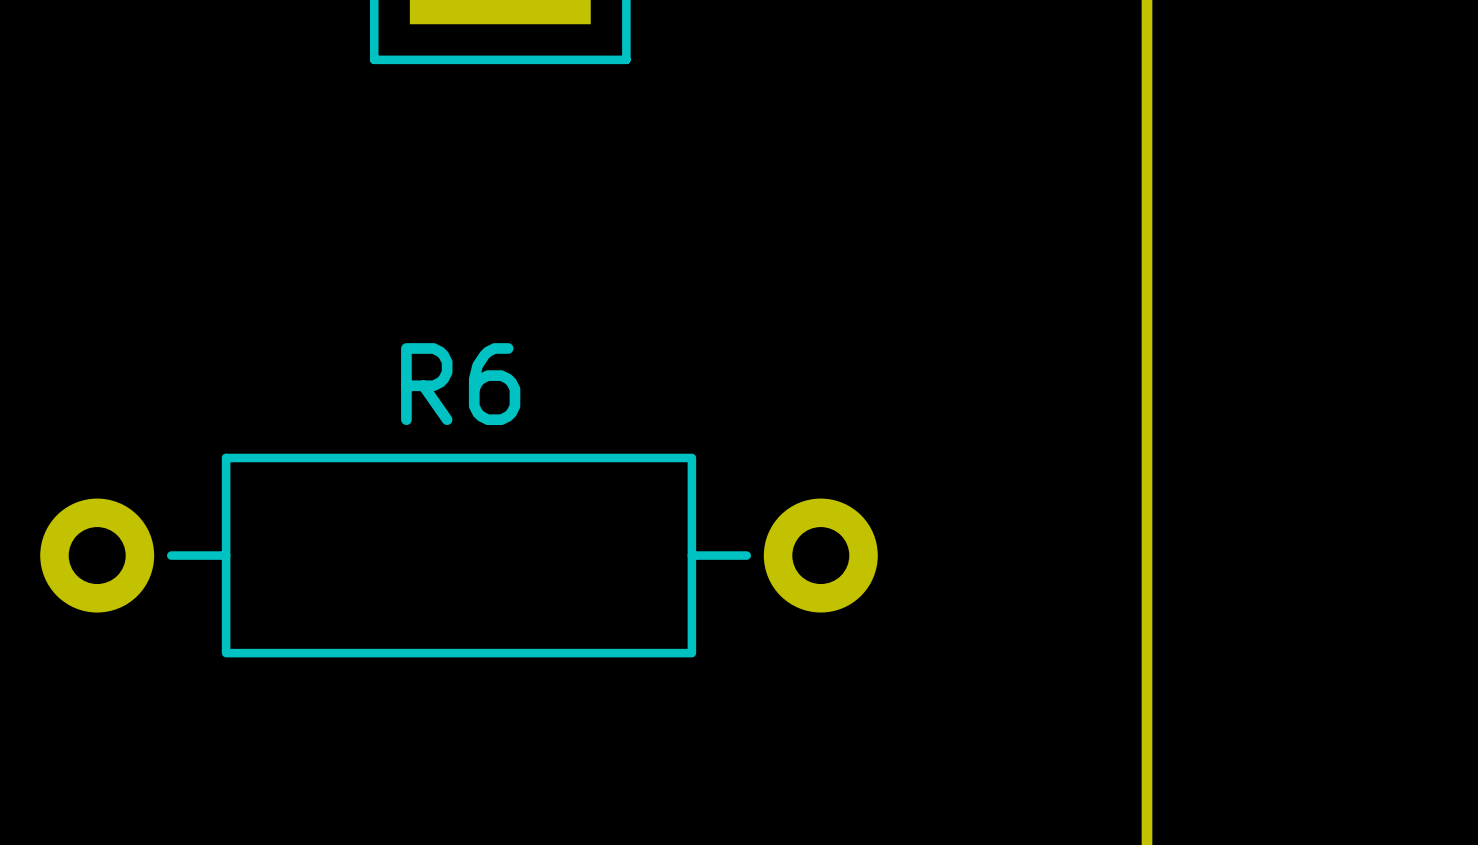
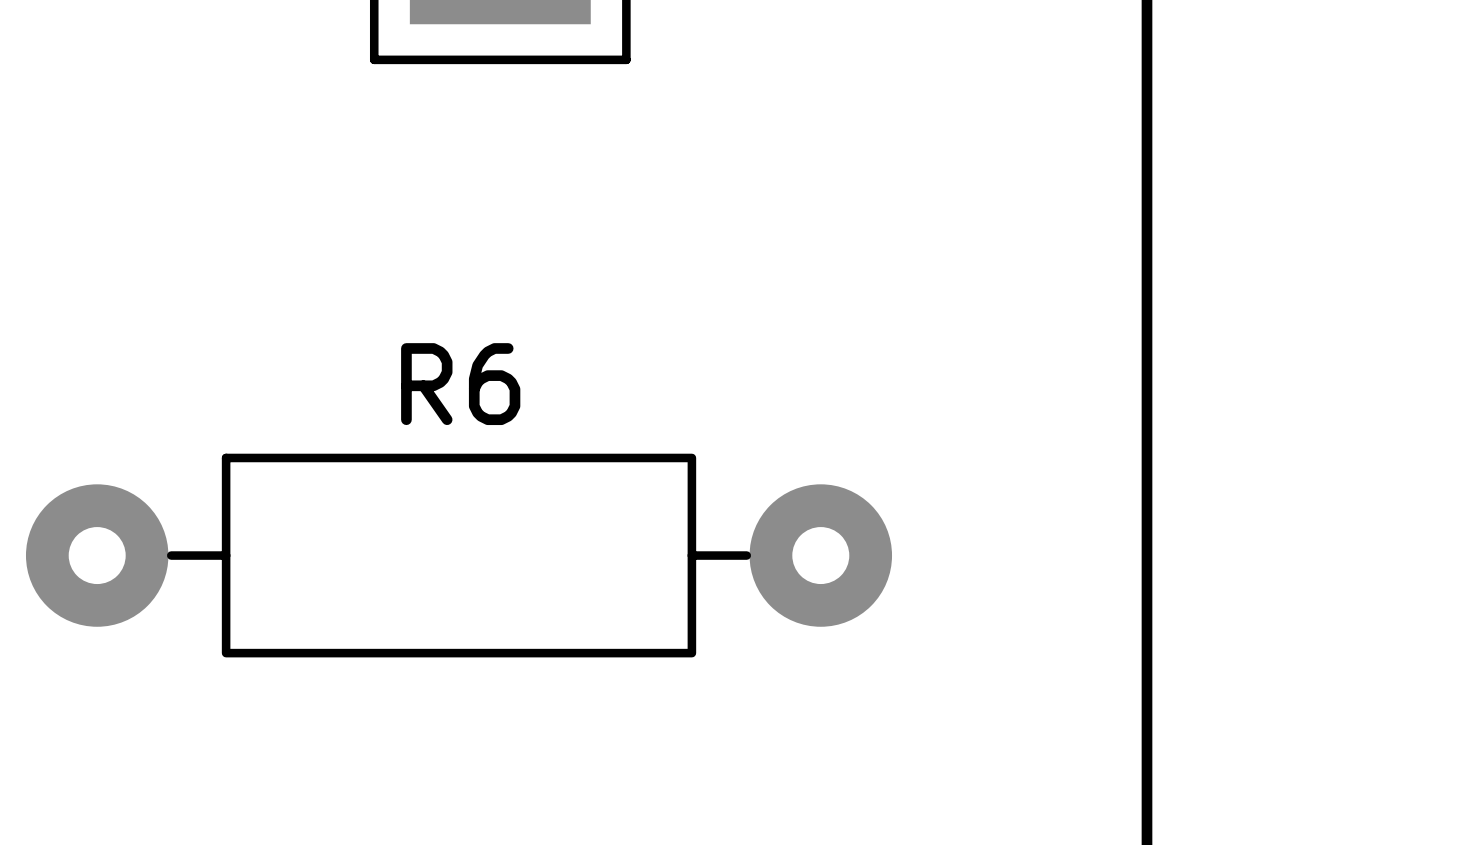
R6 footprint: [40, 453, 878, 658] -> [25, 453, 893, 658]

